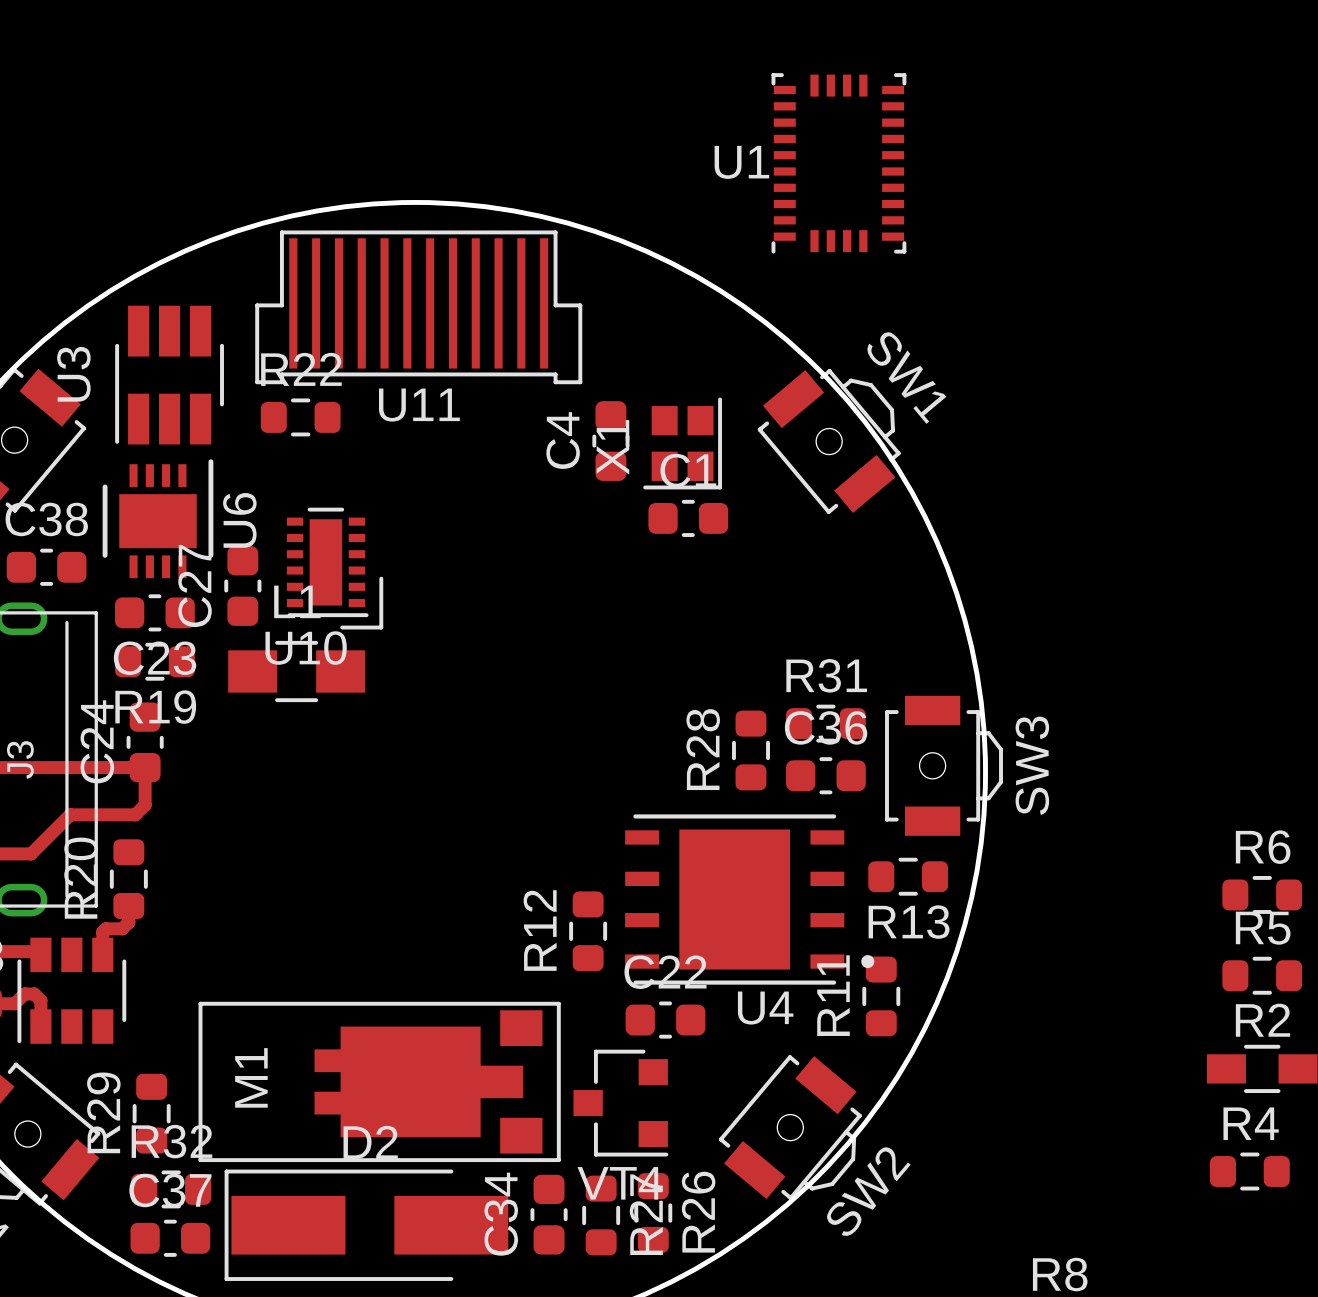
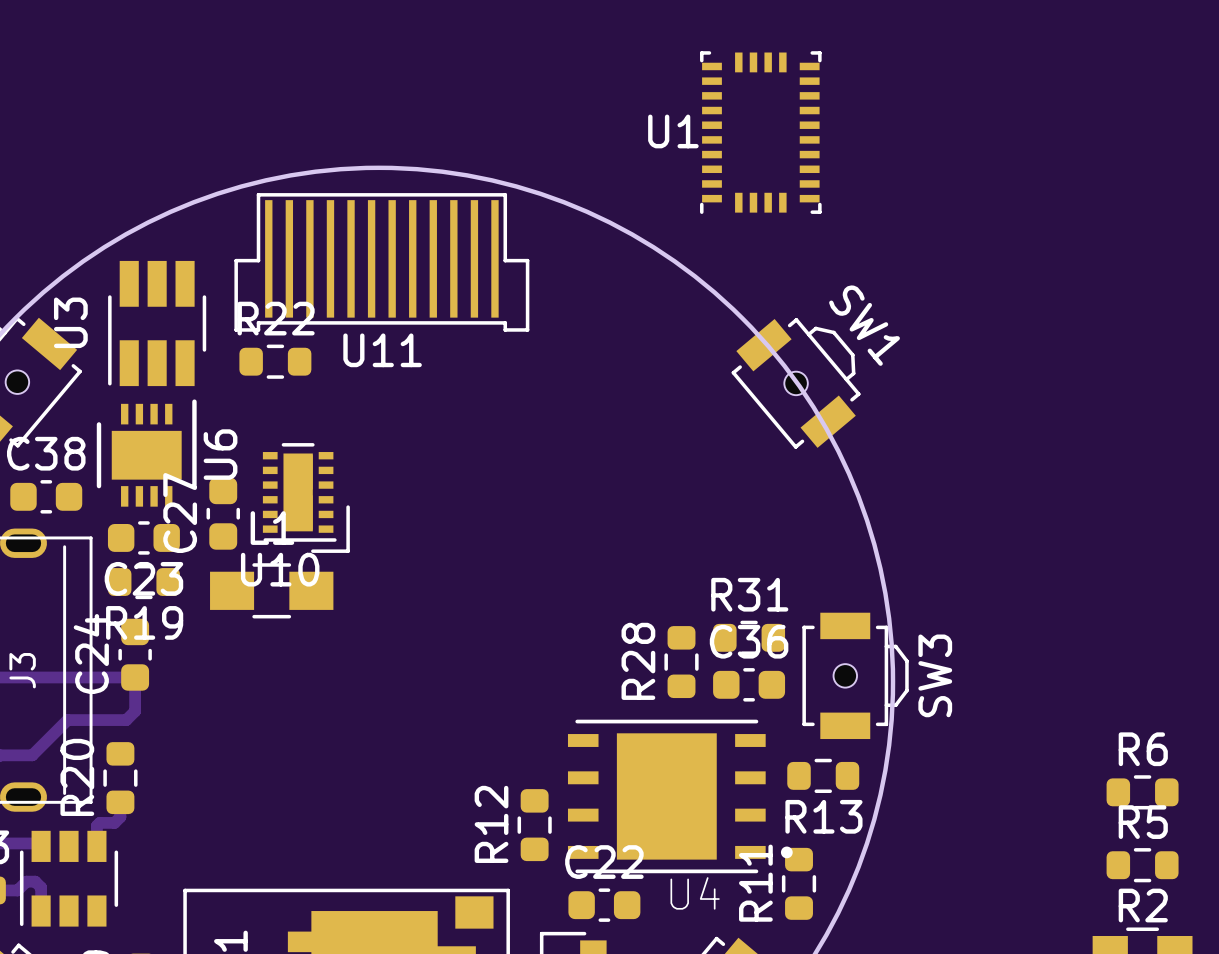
C4: (610, 441) -> none
SW1 position: (829, 441) -> (796, 383)
X1: (682, 443) -> none
C1: (688, 518) -> none

